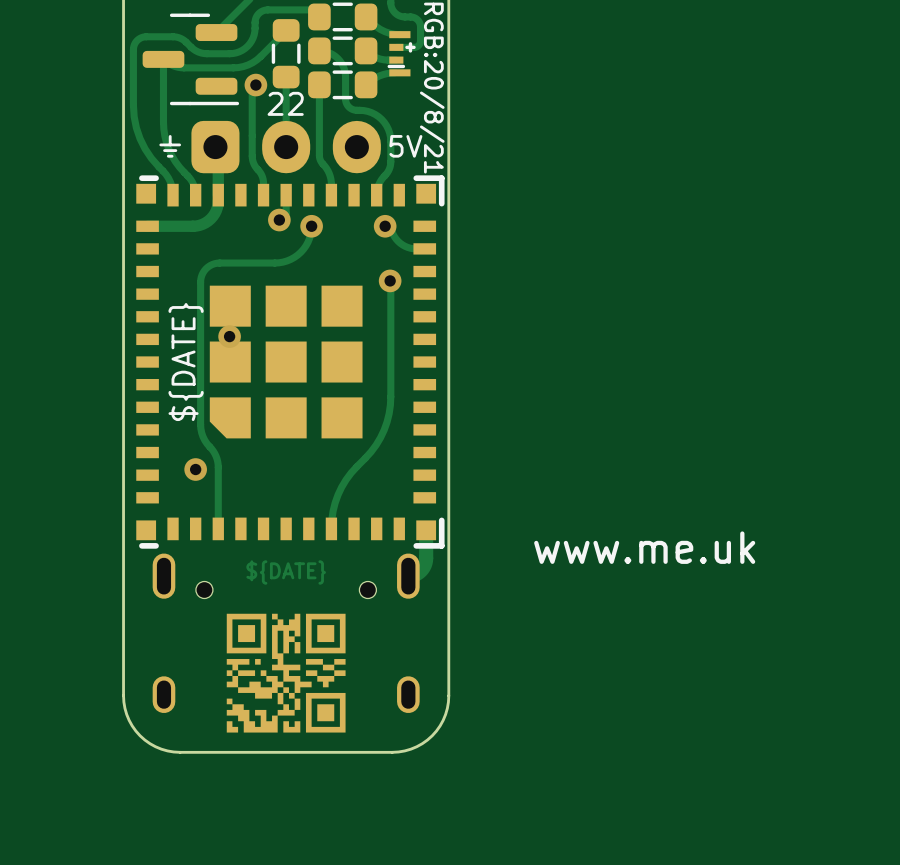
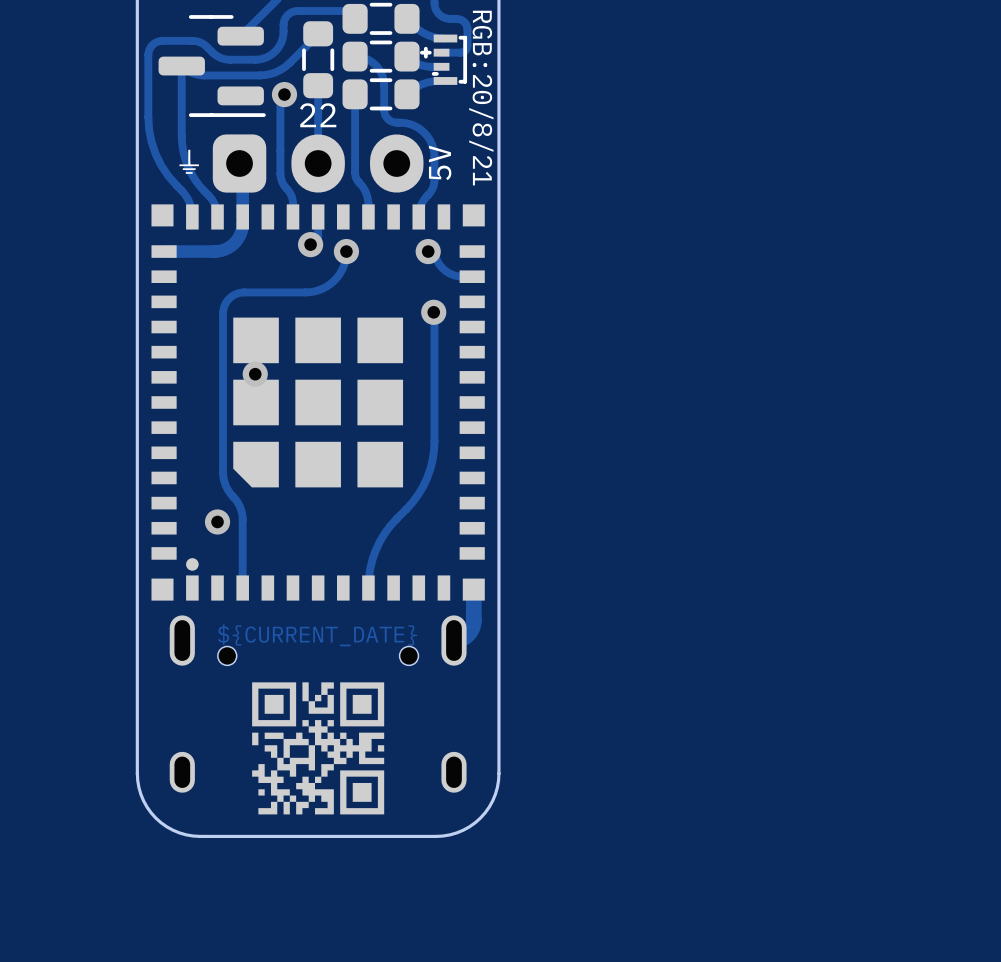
part footprint: [387, 31, 416, 77] -> [420, 34, 468, 85]
text rotation: 0° (405, 146) -> 90° counterclockwise (440, 162)
part footprint: [136, 175, 445, 549] -> [151, 204, 485, 601]
text: www.me.uk (644, 547) -> none
part footprint: [226, 613, 346, 733] -> [252, 682, 385, 815]

